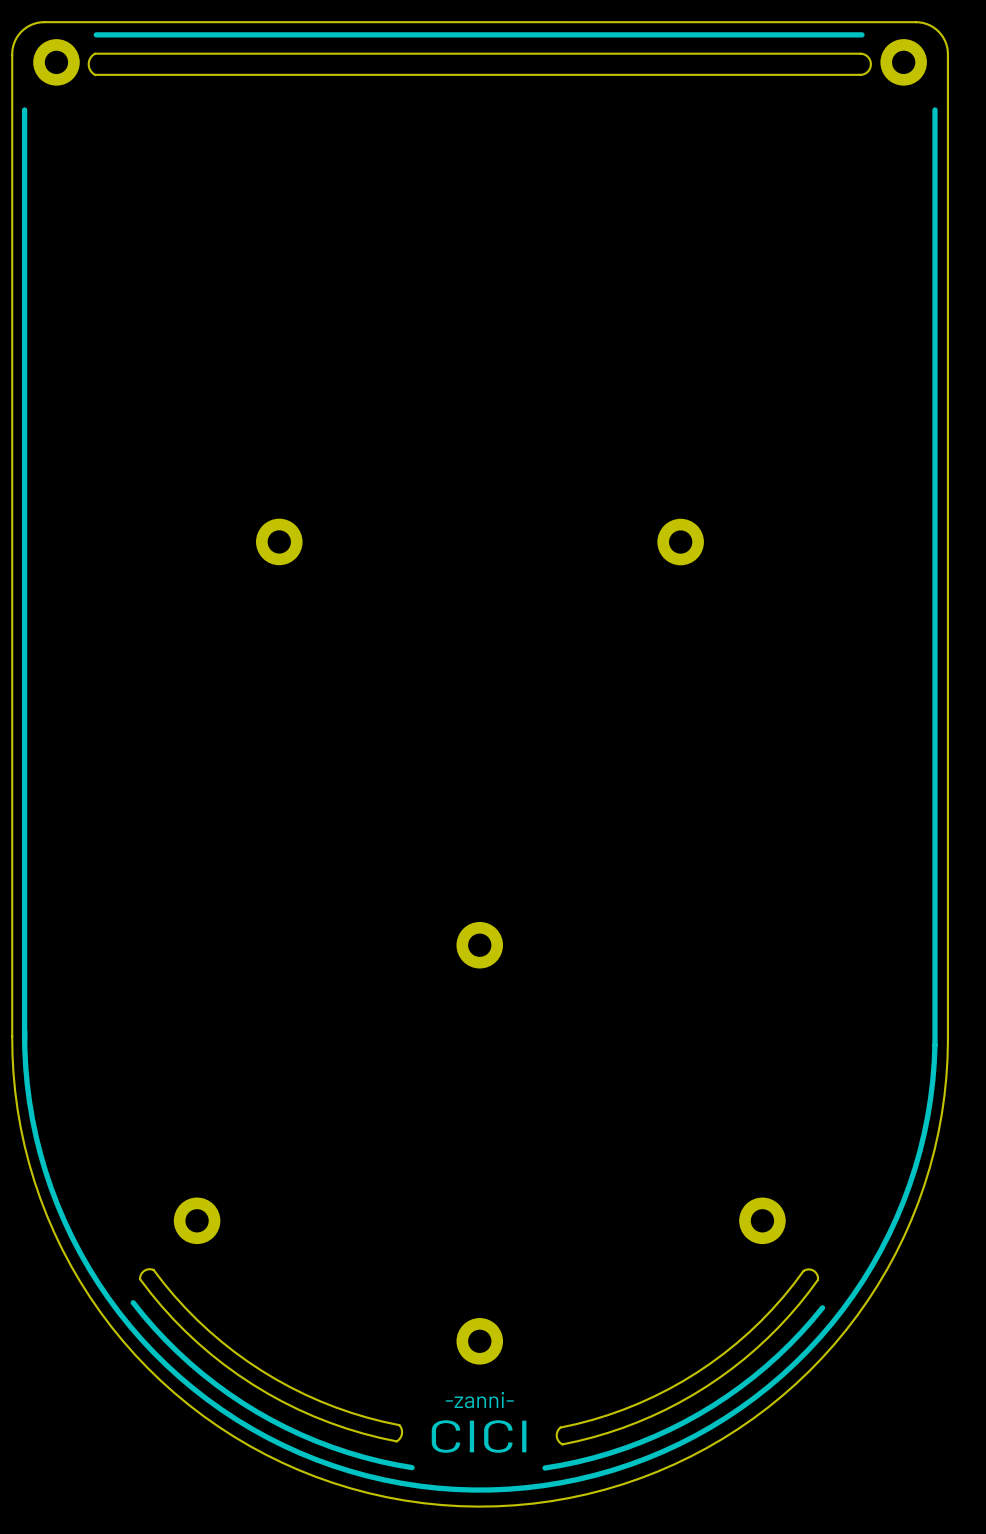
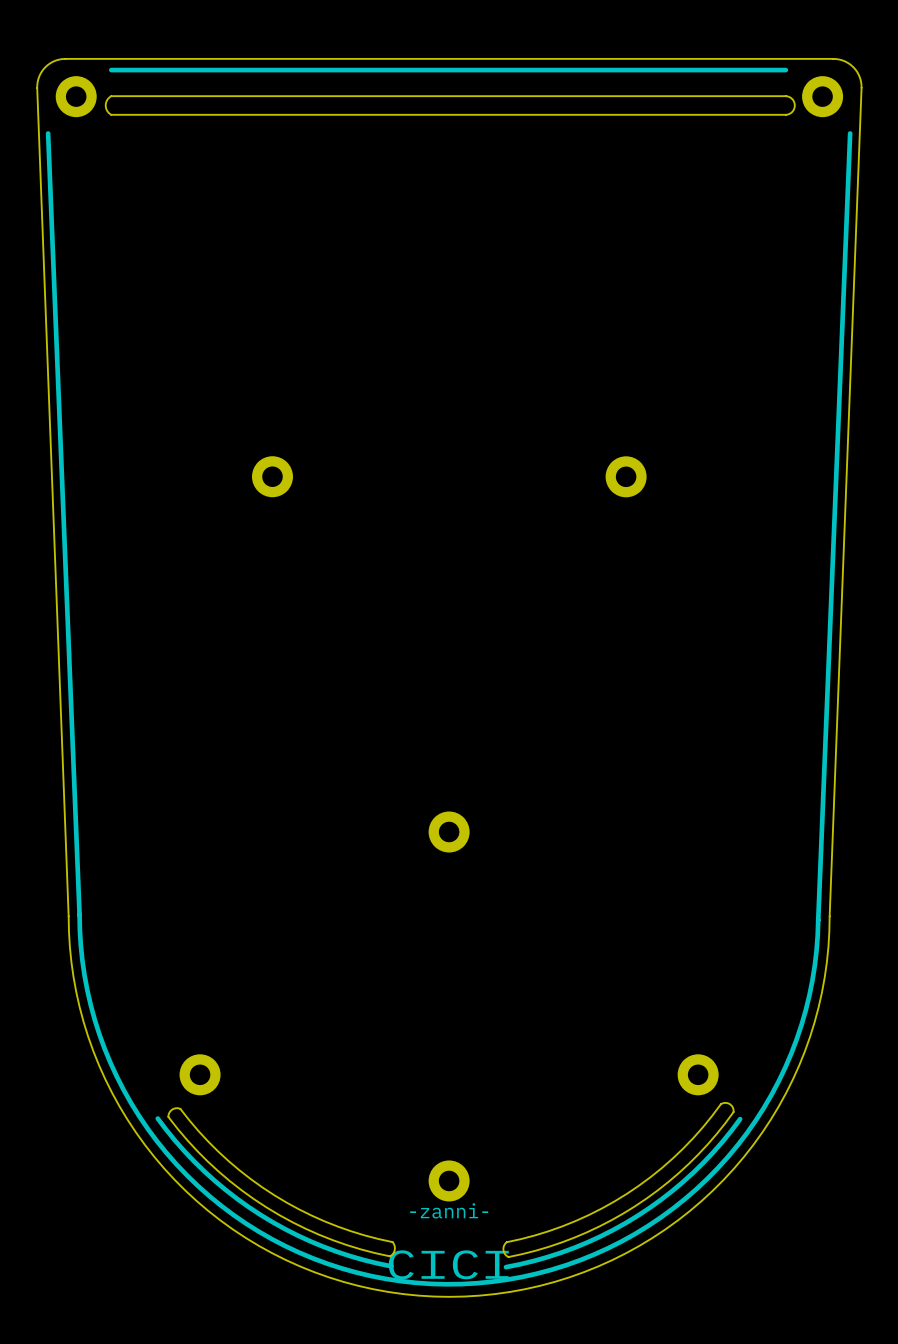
board edge: (915, 22) (44, 22) (26, 27) (15, 40) (12, 55) (12, 1036) (15, 1091) (20, 1127) (34, 1181) (54, 1232) (80, 1281) (111, 1326) (147, 1368) (188, 1404) (233, 1436) (298, 1470) (350, 1488) (386, 1497) (422, 1503) (477, 1506) (532, 1503) (569, 1498) (604, 1489) (657, 1471) (706, 1448) (738, 1428) (767, 1407) (809, 1371) (846, 1330) (867, 1300) (887, 1269) (911, 1219) (929, 1167) (938, 1132) (944, 1095) (947, 1040) (947, 54) (945, 40) (938, 31) (930, 25) (915, 22) -> (833, 58) (845, 61) (853, 67) (860, 78) (861, 87) (828, 946) (818, 1007) (799, 1065) (786, 1093) (762, 1132) (743, 1157) (712, 1190) (689, 1211) (652, 1237) (625, 1253) (584, 1272) (555, 1281) (510, 1291) (479, 1295) (433, 1296) (373, 1289) (328, 1277) (300, 1266) (258, 1245) (220, 1220) (185, 1190) (154, 1157) (127, 1119) (105, 1079) (88, 1036) (76, 992) (68, 931) (37, 88) (39, 75) (50, 63) (65, 58) (833, 58)
line: (861, 34) (96, 34) -> (785, 70) (111, 70)
board edge: (95, 53) (93, 54) (92, 55) (90, 57) (88, 64) (90, 69) (95, 74) (860, 74) (867, 71) (870, 64) (867, 56) (860, 53) (95, 53) -> (111, 96) (110, 96) (109, 97) (107, 99) (105, 105) (111, 114) (785, 114) (792, 111) (794, 105) (792, 99) (785, 96) (111, 96)
part position: (56, 62) -> (76, 96)
part position: (903, 62) -> (822, 96)
line: (24, 109) (24, 1039) -> none
line: (934, 109) (934, 1045) (932, 1080) (924, 1133) (915, 1167) (889, 1234) (853, 1295) (808, 1350) (754, 1397) (695, 1436) (629, 1464) (578, 1479) (508, 1489) (437, 1488) (367, 1475) (299, 1452) (236, 1419) (179, 1377) (130, 1326) (98, 1283) (64, 1220) (40, 1154) (27, 1084) (24, 1030) -> none
line: none -> (850, 133) (817, 935) (809, 995) (796, 1039) (771, 1094) (747, 1132) (707, 1178) (660, 1217) (608, 1248) (565, 1265) (506, 1279) (446, 1284) (400, 1281) (341, 1268) (285, 1245) (233, 1214) (186, 1175) (147, 1128) (123, 1090) (99, 1034) (87, 990) (79, 930) (48, 133)
line: none -> (157, 1118) (184, 1151) (204, 1171) (237, 1198) (260, 1214) (297, 1235) (323, 1246) (350, 1256) (391, 1266)
board edge: (153, 1270) (144, 1270) (140, 1277) (150, 1292) (185, 1331) (238, 1375) (282, 1401) (330, 1422) (396, 1441) (400, 1437) (402, 1431) (399, 1425) (351, 1412) (320, 1401) (290, 1387) (248, 1361) (197, 1319) (153, 1270) -> (180, 1108) (218, 1151) (262, 1187) (286, 1202) (324, 1221) (351, 1231) (392, 1242) (394, 1247) (393, 1253) (390, 1256) (332, 1240) (292, 1222) (253, 1199) (218, 1171) (177, 1128) (168, 1115) (172, 1109) (180, 1108)
board edge: (803, 1271) (811, 1269) (817, 1276) (817, 1279) (808, 1292) (767, 1338) (719, 1378) (679, 1402) (637, 1422) (577, 1441) (562, 1444) (558, 1441) (556, 1434) (560, 1427) (608, 1415) (638, 1403) (682, 1381) (710, 1363) (760, 1321) (803, 1271) -> (720, 1104) (727, 1103) (733, 1108) (733, 1112) (725, 1123) (688, 1163) (646, 1198) (611, 1220) (574, 1237) (521, 1254) (508, 1257) (505, 1254) (503, 1247) (506, 1242) (548, 1231) (575, 1220) (601, 1208) (638, 1185) (683, 1148) (720, 1104)
line: none -> (740, 1119) (722, 1141) (693, 1172) (660, 1199) (637, 1215) (612, 1230) (574, 1247) (547, 1257) (505, 1267)
line: (133, 1302) (154, 1328) (189, 1363) (228, 1393) (256, 1411) (301, 1434) (331, 1447) (379, 1461) (412, 1467) -> none
line: (822, 1307) (801, 1332) (765, 1366) (726, 1396) (698, 1414) (655, 1436) (624, 1448) (577, 1461) (545, 1468) -> none
text position: -zanni- (479, 1400) -> -zanni- (449, 1210)

